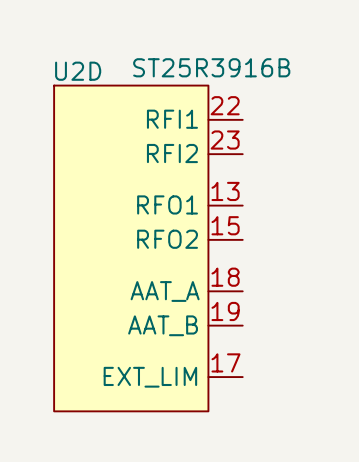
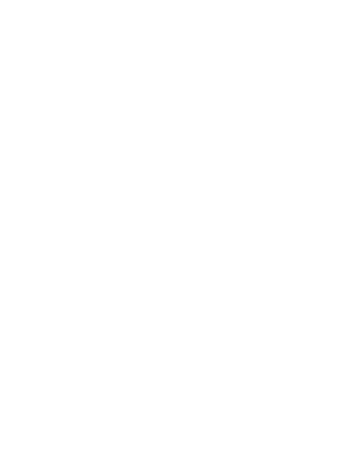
U2D: ST25R3916B (148, 248) -> none

